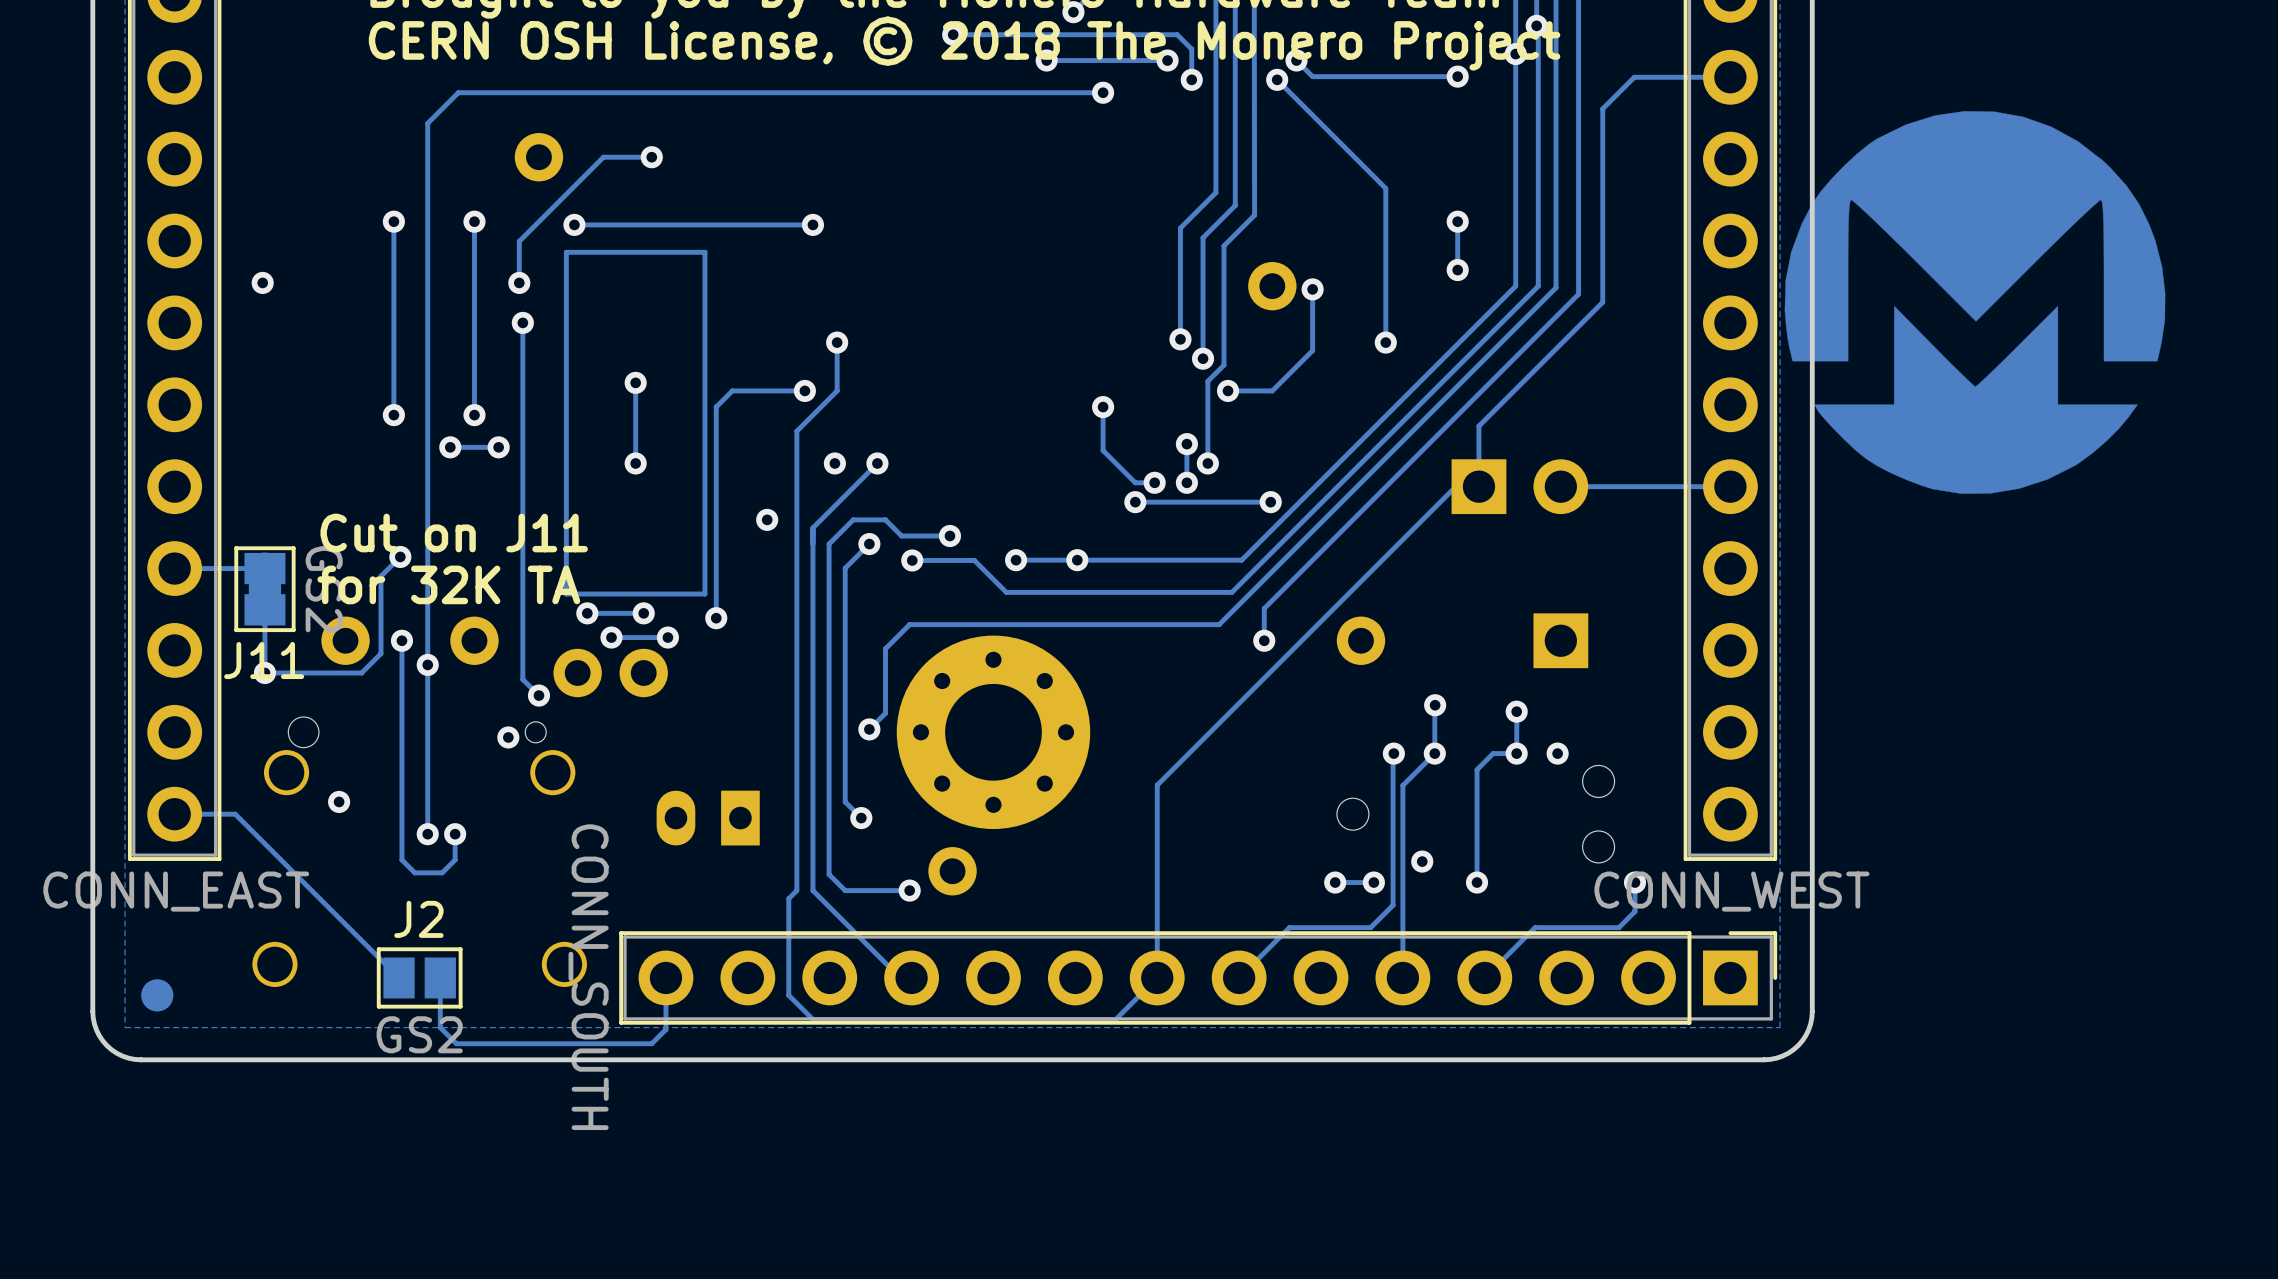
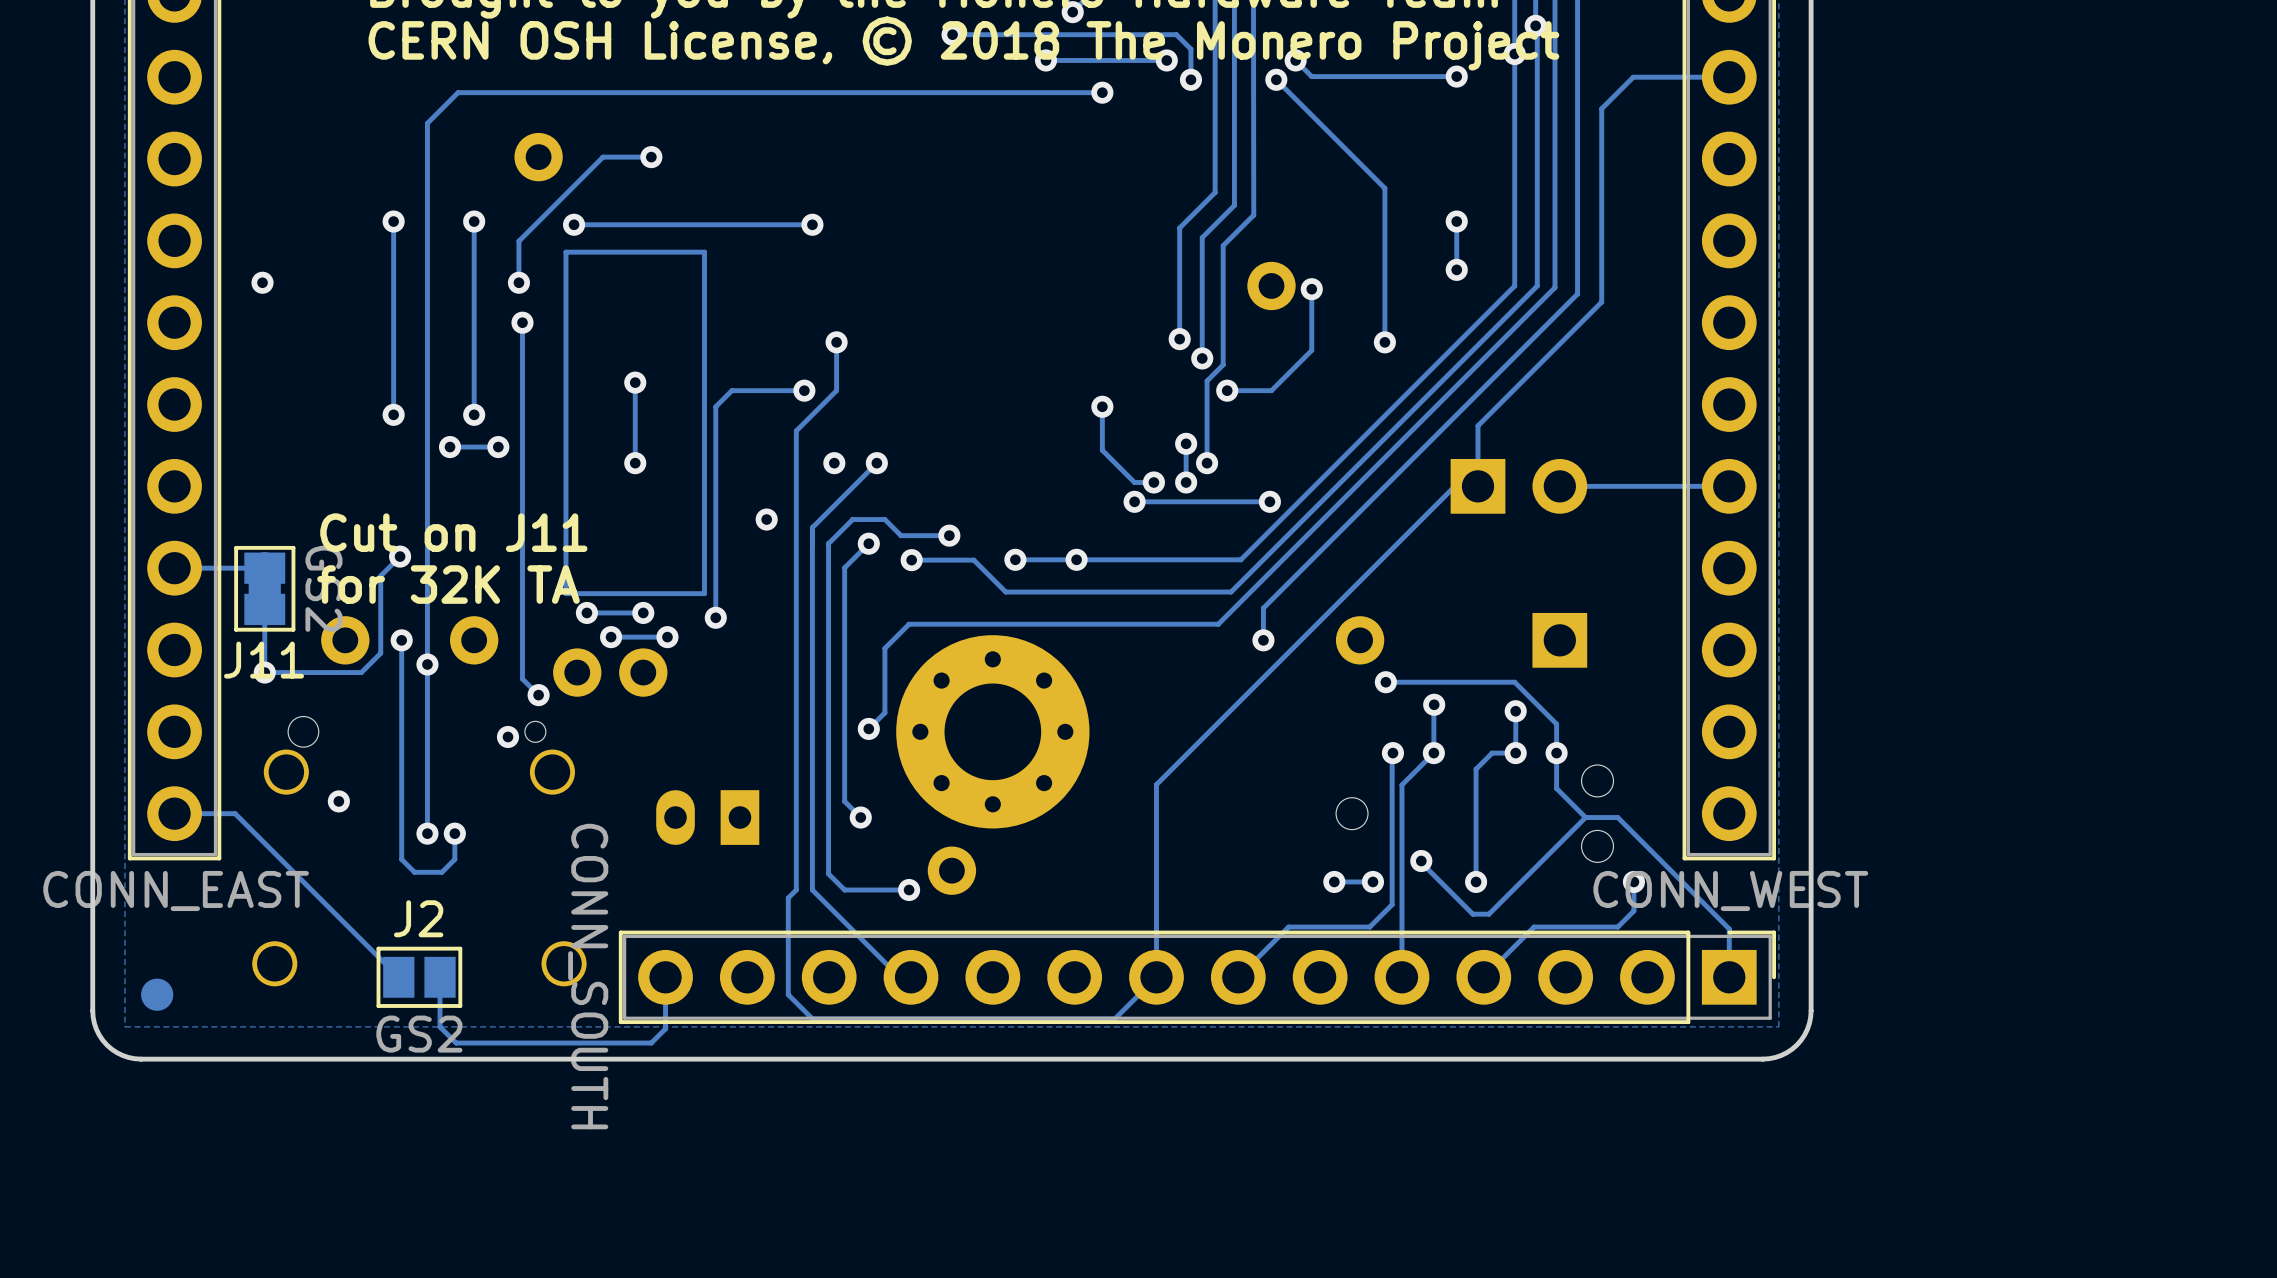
drawing: [1784, 111, 2166, 494] -> none
track: none -> (1385, 682) (1514, 682) (1556, 724) (1556, 788) (1585, 817)
via: none -> (1385, 682)
track: none -> (1585, 817) (1488, 914) (1472, 914) (1421, 861)
track: none -> (1585, 817) (1617, 817) (1729, 928) (1729, 977)

